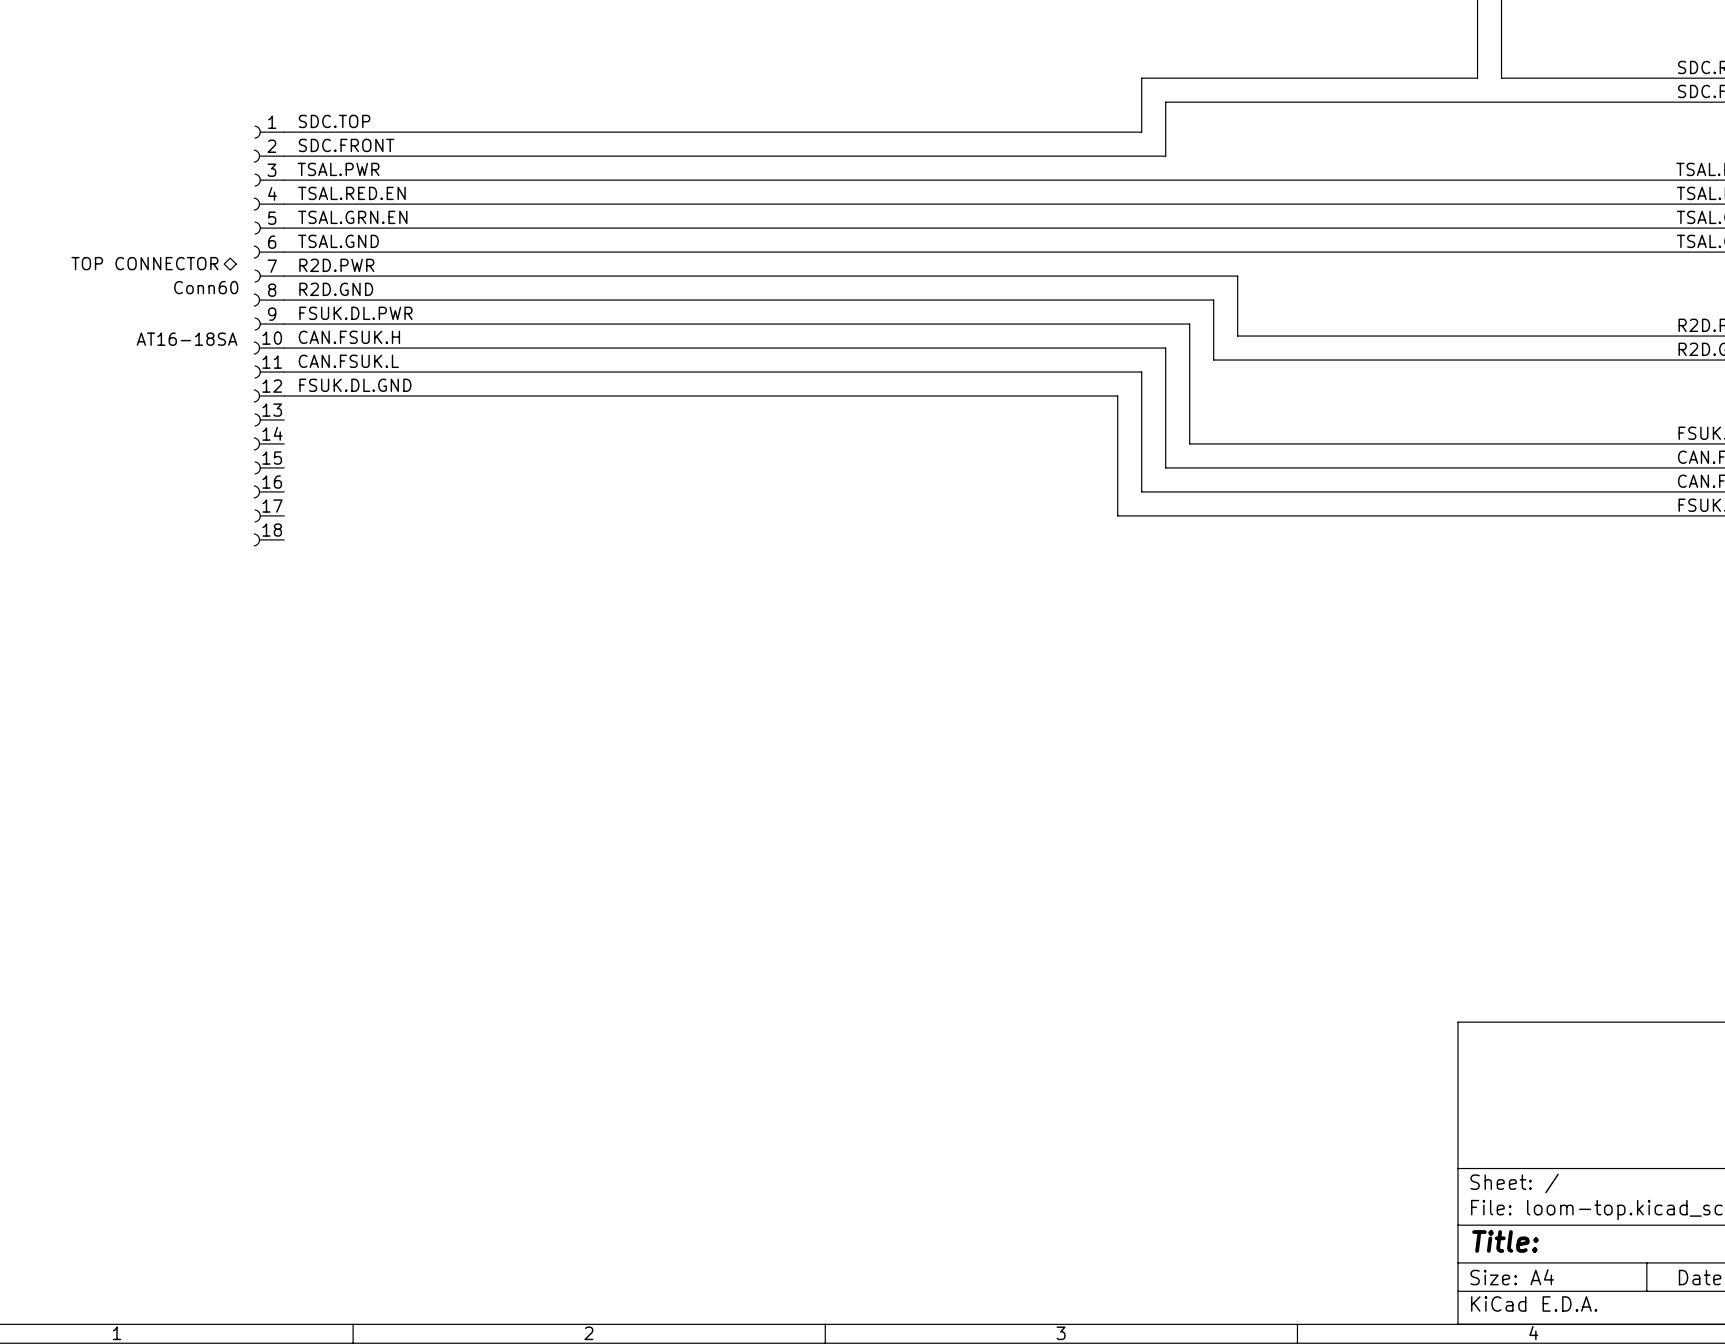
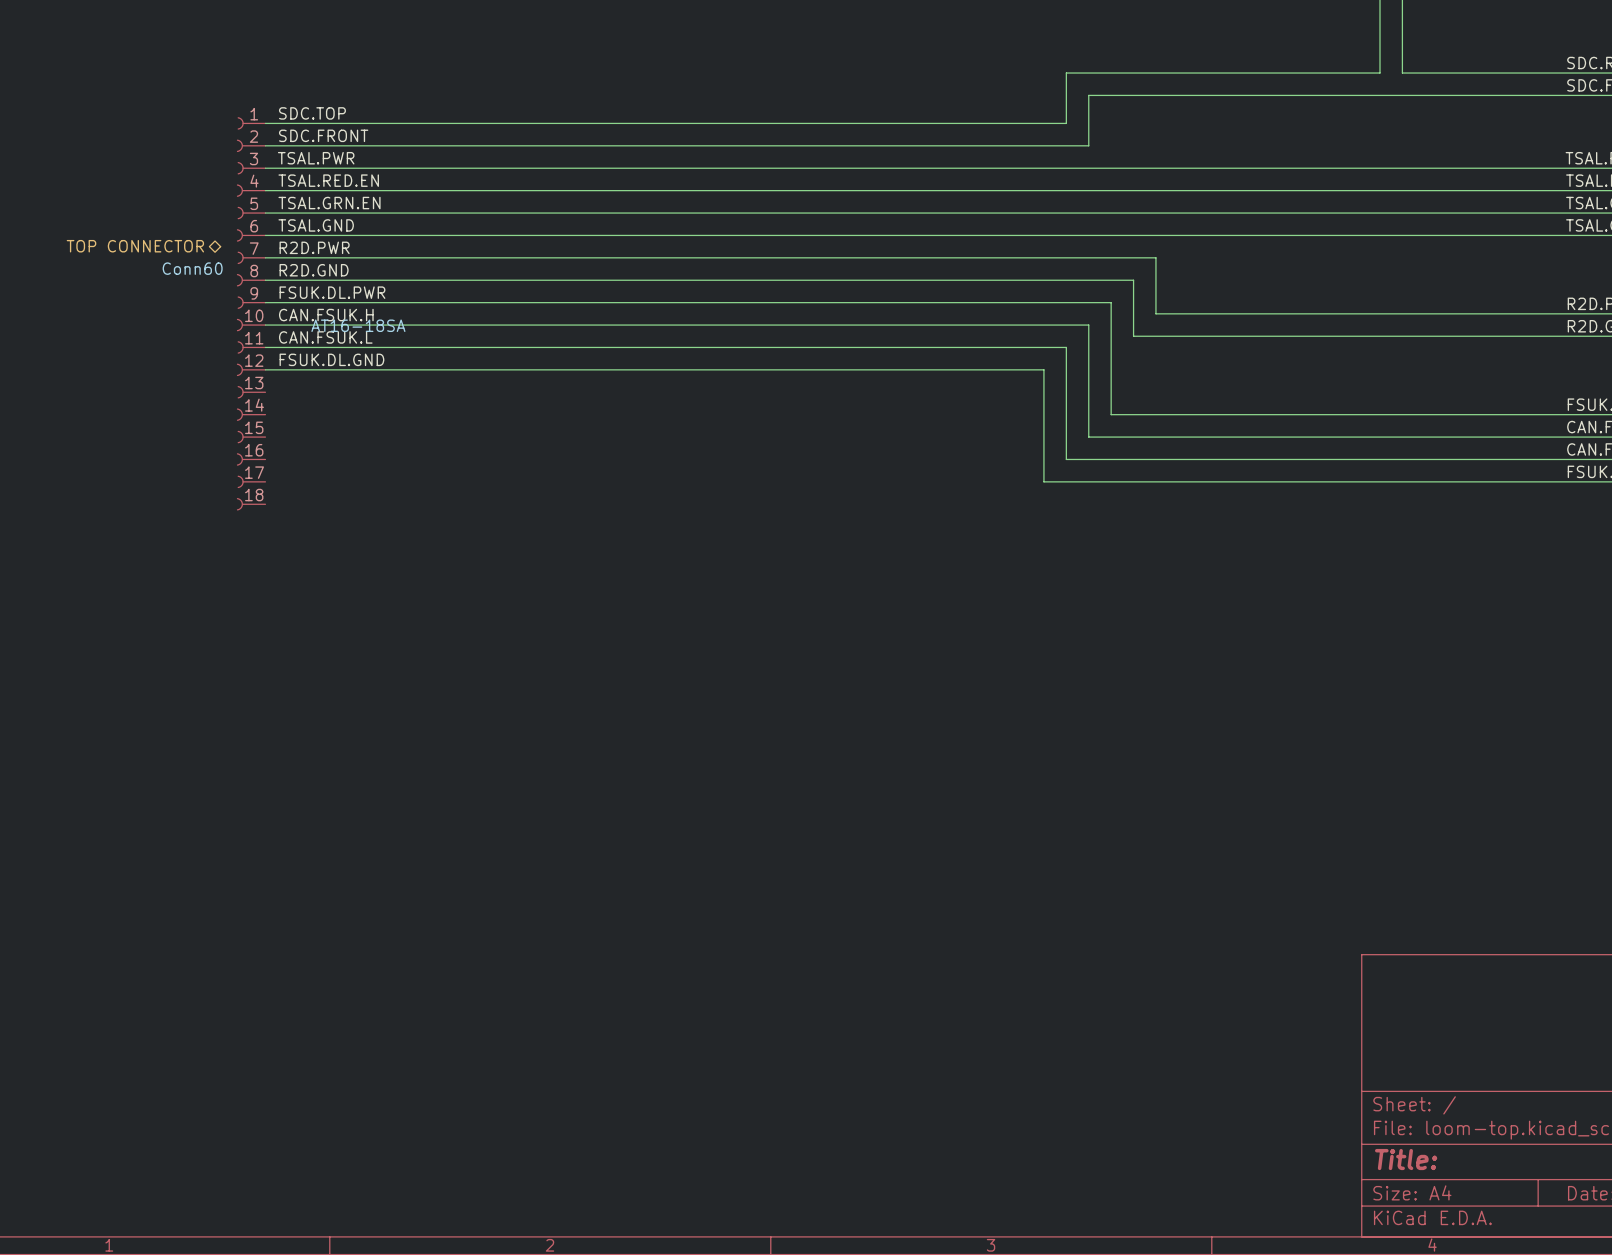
Conn60 text position: AT16-18SA (187, 339) -> AT16-18SA (358, 325)

